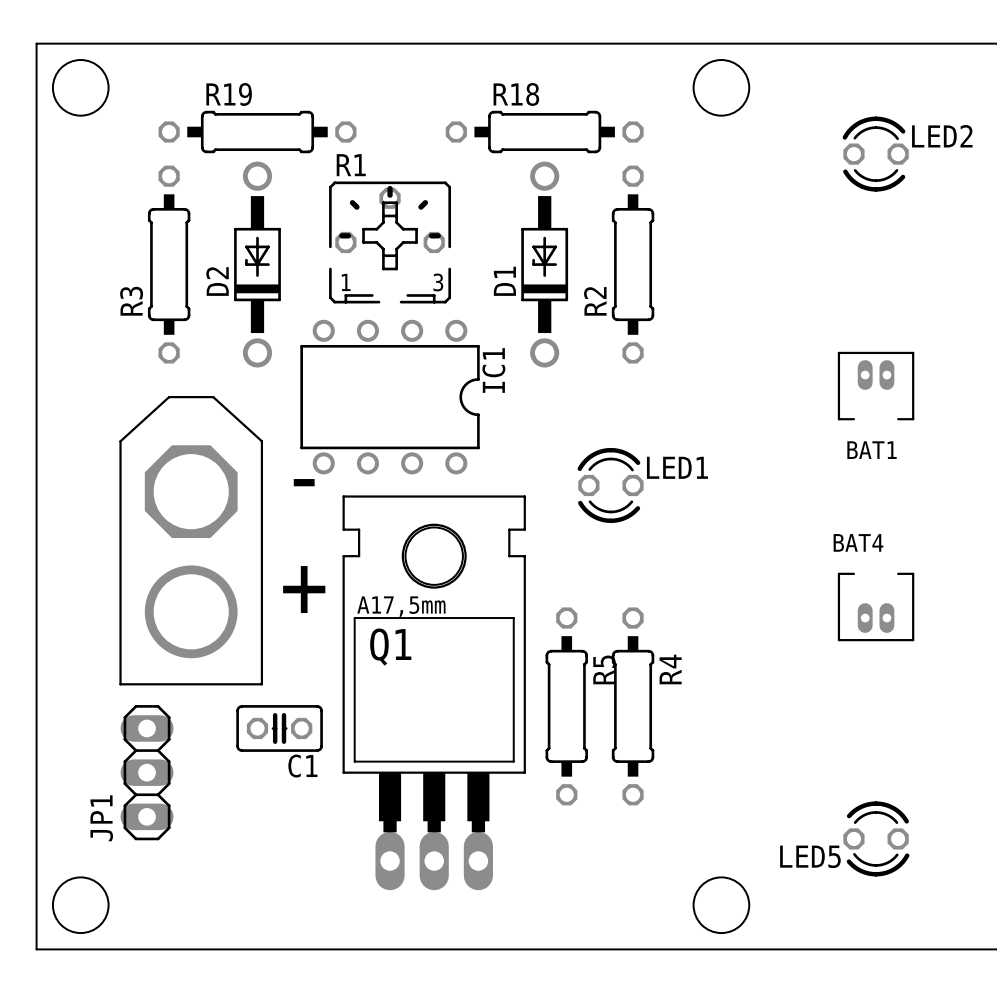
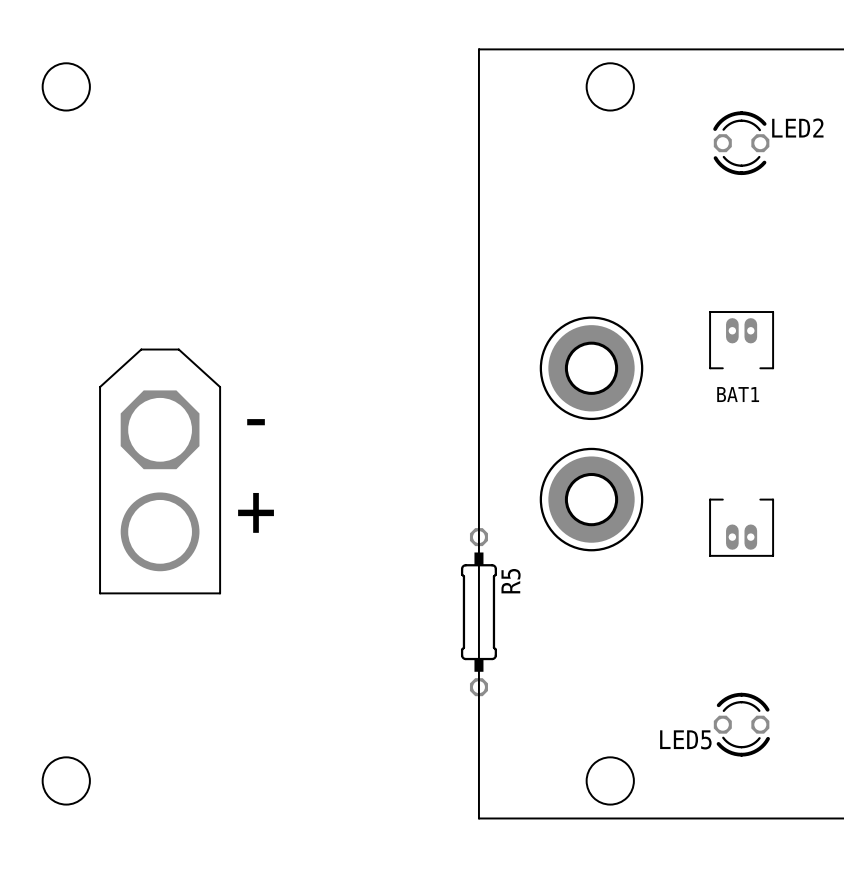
board edge: (566, 43) (36, 43) (36, 949) (566, 949) -> (478, 49) (478, 818)
R19: (257, 132) -> none
R18: (544, 132) -> none
R1: (390, 242) -> none
R3: (169, 264) -> none
D2: (257, 264) -> none
D1: (544, 264) -> none
R2: (633, 264) -> none
IC1: (390, 397) -> none
part: none -> (591, 368)
LED1: (610, 485) -> none
text: BAT4 (858, 542) -> none
part: none -> (591, 499)
Q1: (434, 692) -> none
R4: (633, 706) -> none
C1: (279, 728) -> none
JP1: (147, 772) -> none

